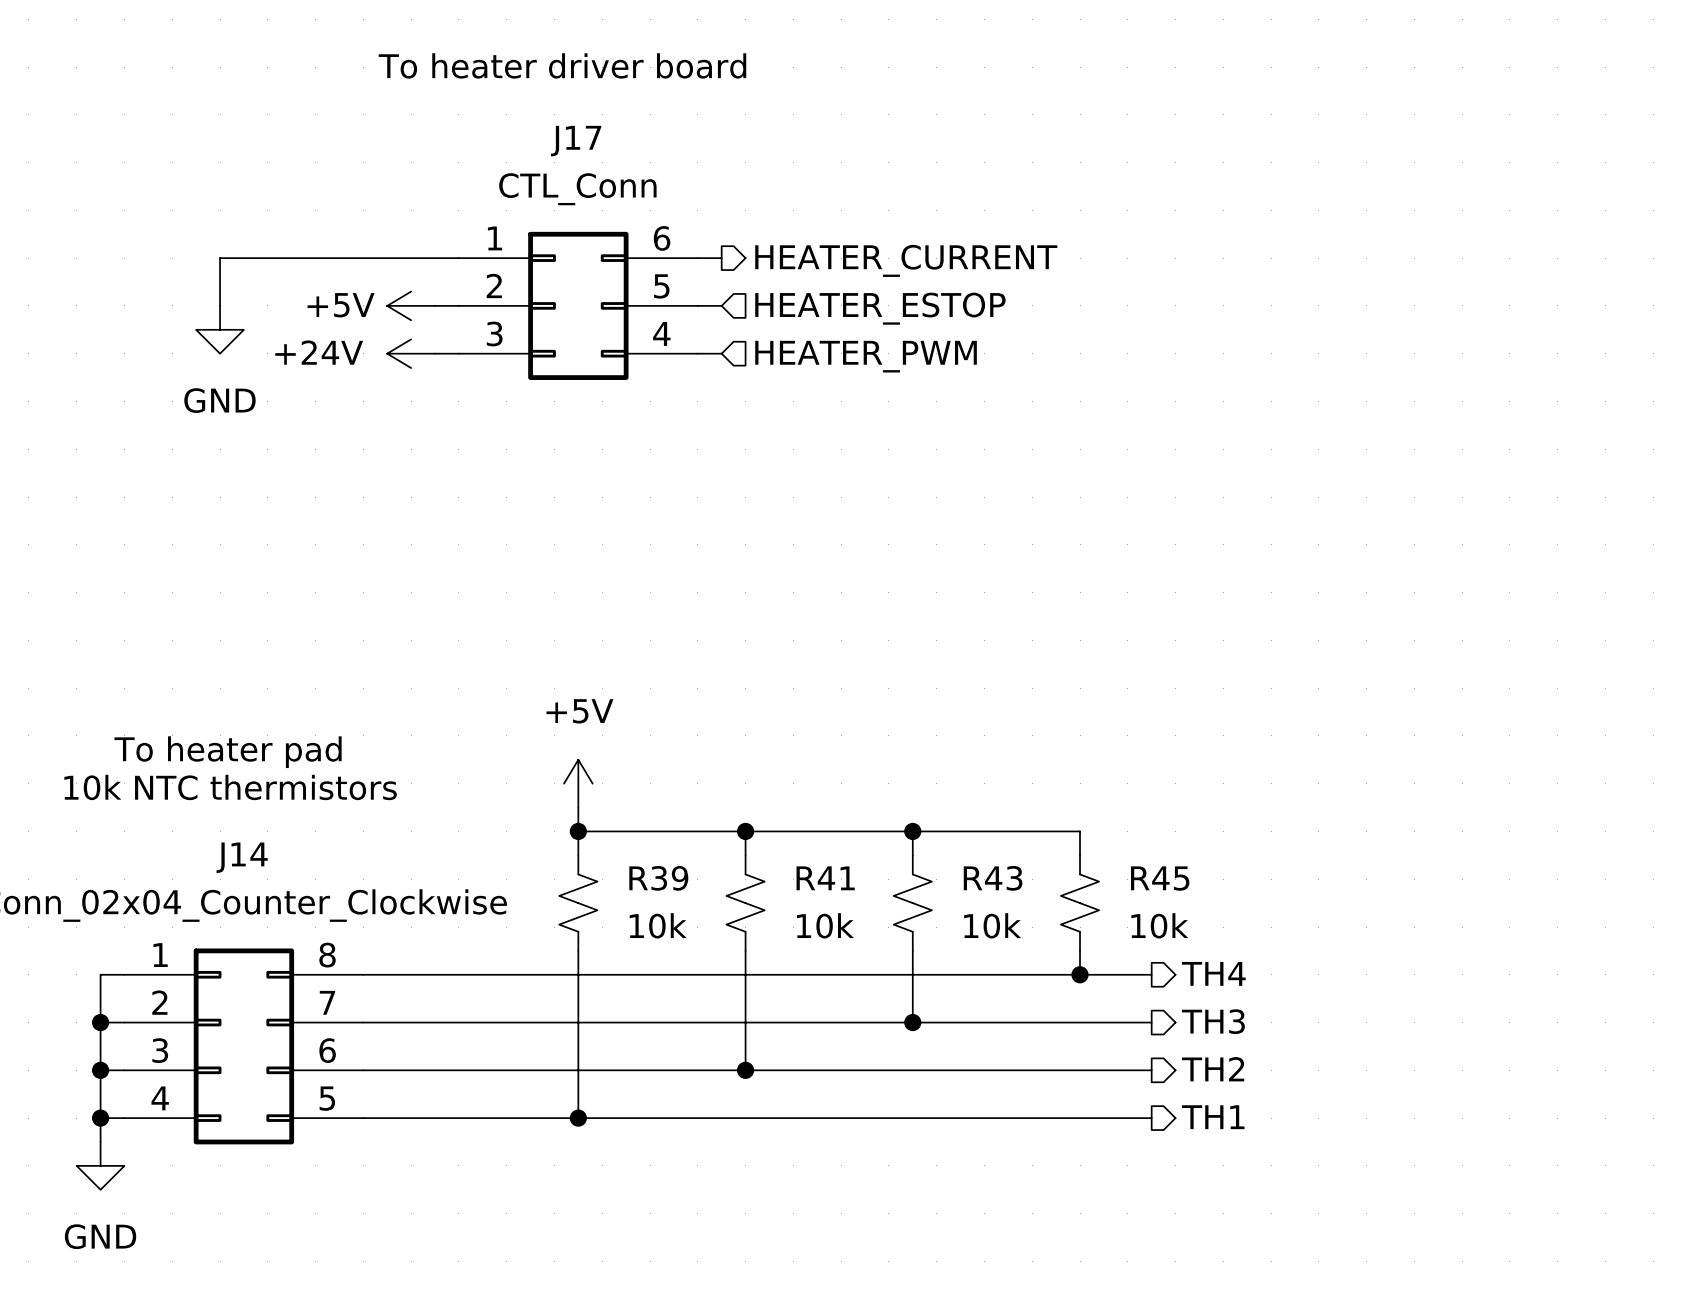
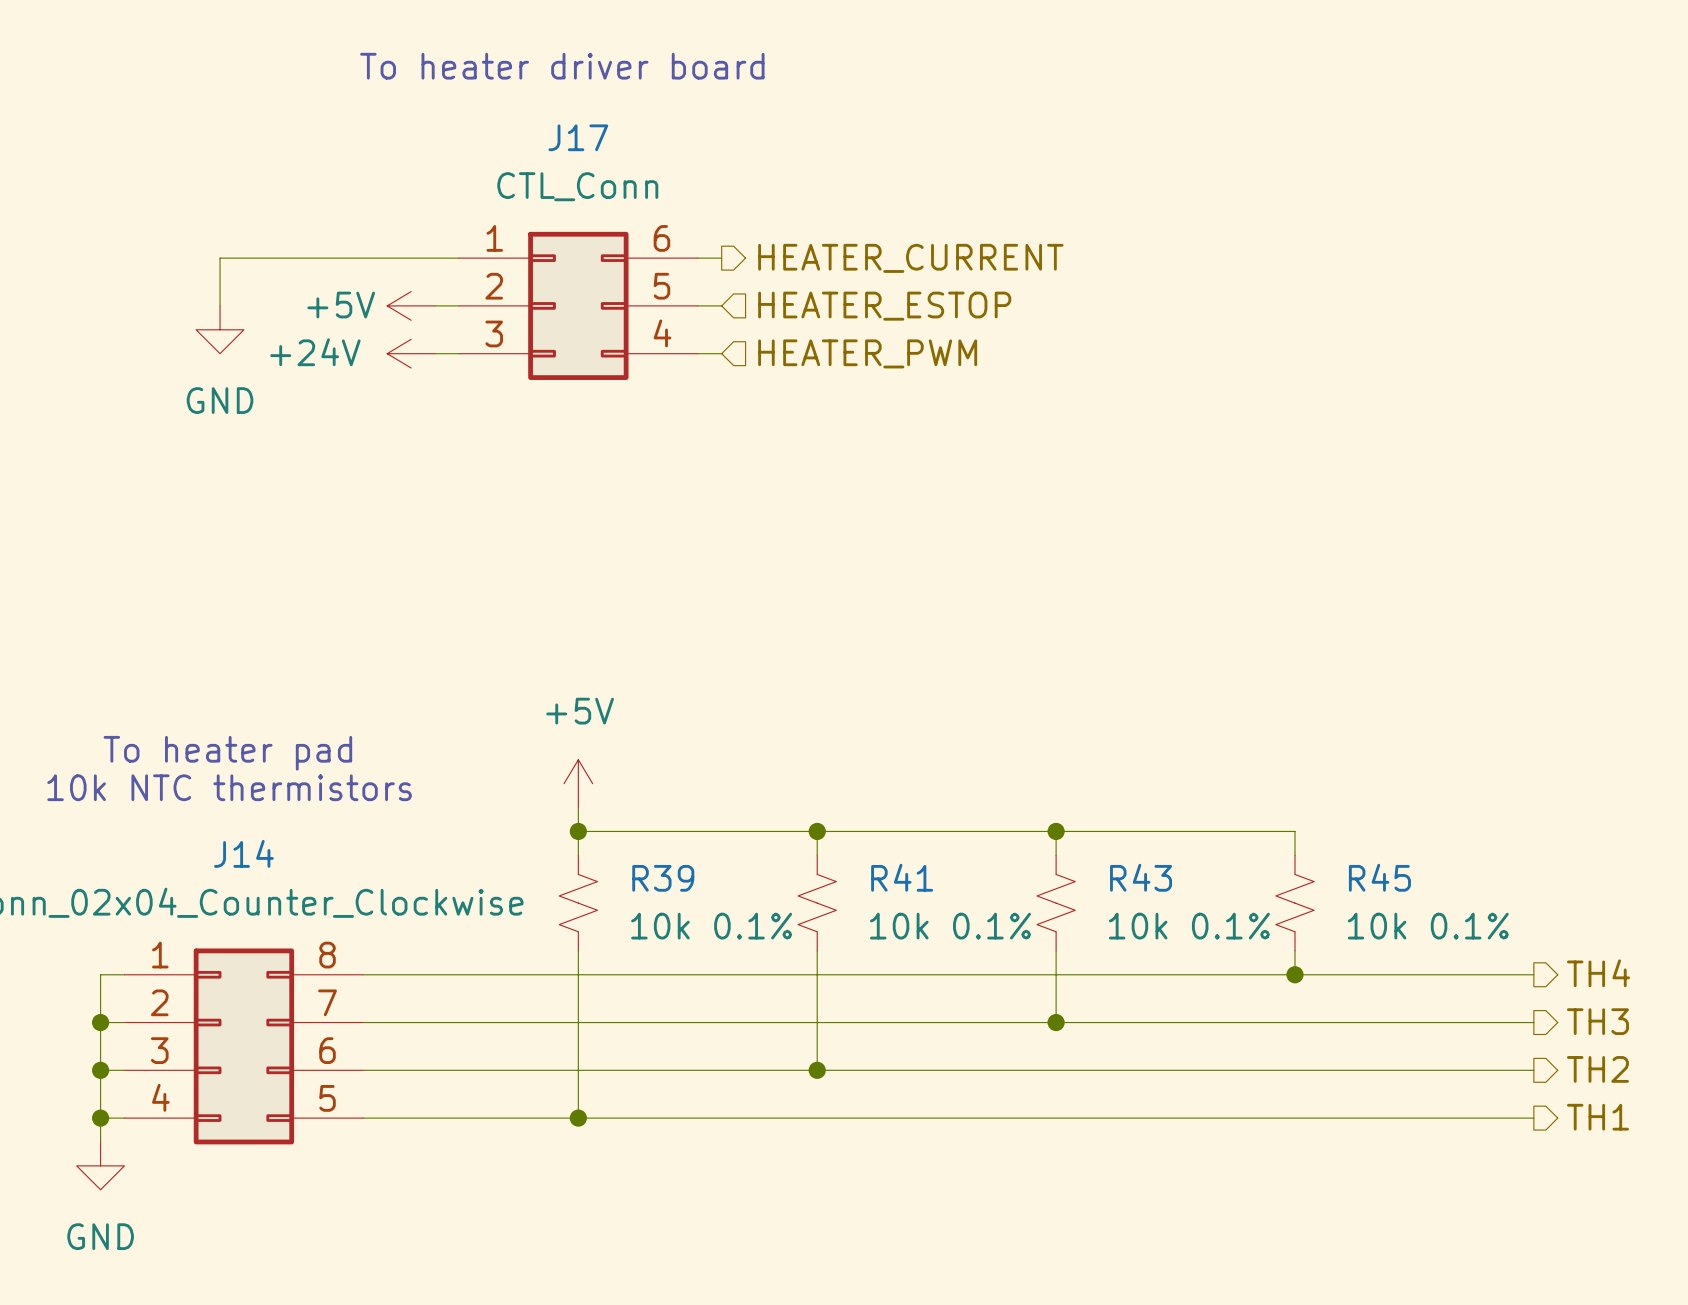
wire: (745, 831) (745, 855) -> (817, 831) (817, 855)
junction: (745, 831) -> none
junction: none -> (817, 831)
wire: (912, 831) (912, 855) -> (1056, 831) (1056, 855)
junction: (912, 831) -> none
junction: none -> (1056, 831)
wire: (1080, 831) (1080, 855) -> (1080, 831) (1294, 831) (1294, 855)
R41 position: (745, 903) -> (817, 903)
R43 position: (912, 903) -> (1056, 903)
R45 position: (1080, 903) -> (1294, 903)
R39 value: 10k (658, 925) -> 10k 0.1% (711, 926)
R41 value: 10k (825, 925) -> 10k 0.1% (950, 926)
R43 value: 10k (992, 925) -> 10k 0.1% (1189, 926)
R45 value: 10k (1159, 925) -> 10k 0.1% (1428, 926)
wire: (745, 950) (745, 1070) -> (817, 950) (817, 1070)
wire: (912, 950) (912, 1022) -> (1056, 950) (1056, 1022)
wire: (1080, 950) (1080, 974) -> (1294, 950) (1294, 974)
hierarchical label position: TH4 (1213, 973) -> TH4 (1598, 973)
junction position: (1080, 974) -> (1056, 1022)
wire: none -> (1151, 974) (1533, 974)
junction: none -> (1294, 974)
hierarchical label position: TH3 (1213, 1021) -> TH3 (1597, 1021)
junction: (912, 1022) -> none
wire: none -> (1151, 1022) (1533, 1022)
hierarchical label position: TH2 (1213, 1069) -> TH2 (1597, 1069)
junction: (745, 1070) -> none
junction: none -> (817, 1070)
wire: none -> (1151, 1070) (1533, 1070)
hierarchical label position: TH1 (1213, 1117) -> TH1 (1597, 1117)
wire: none -> (1151, 1118) (1533, 1118)

